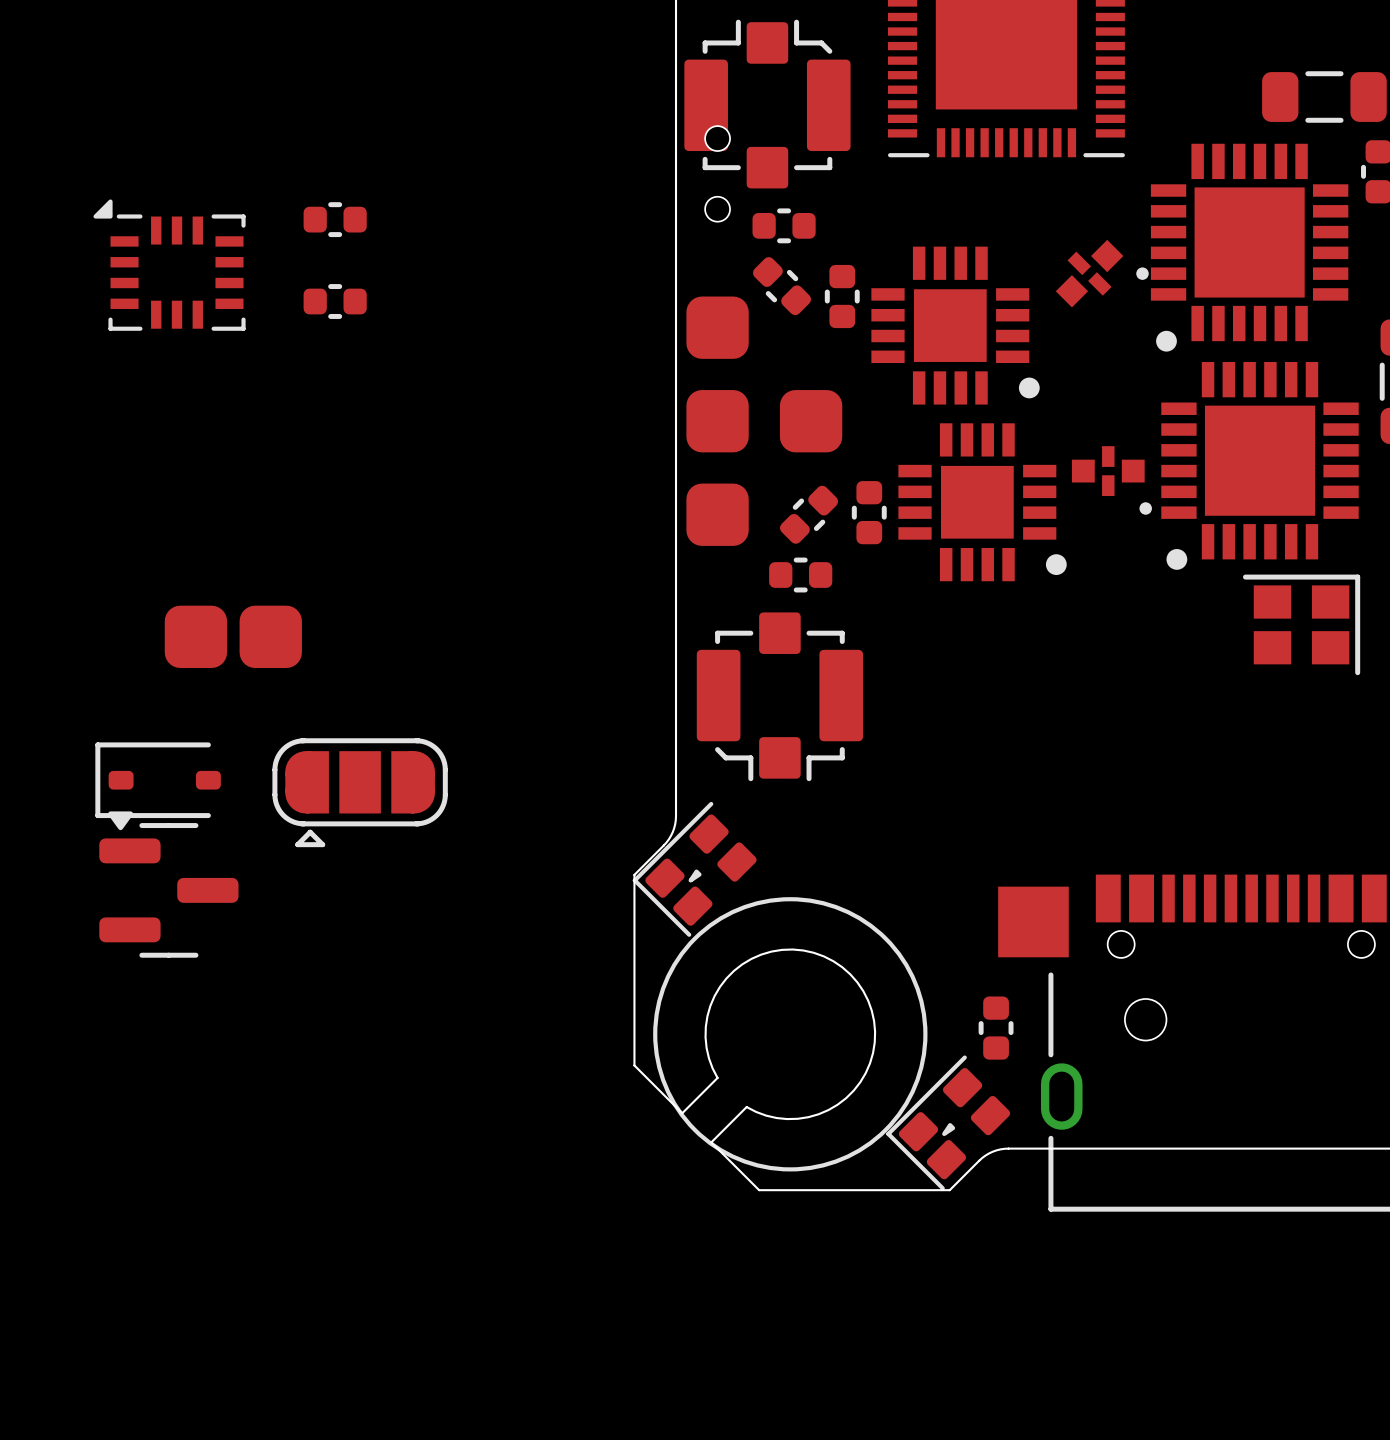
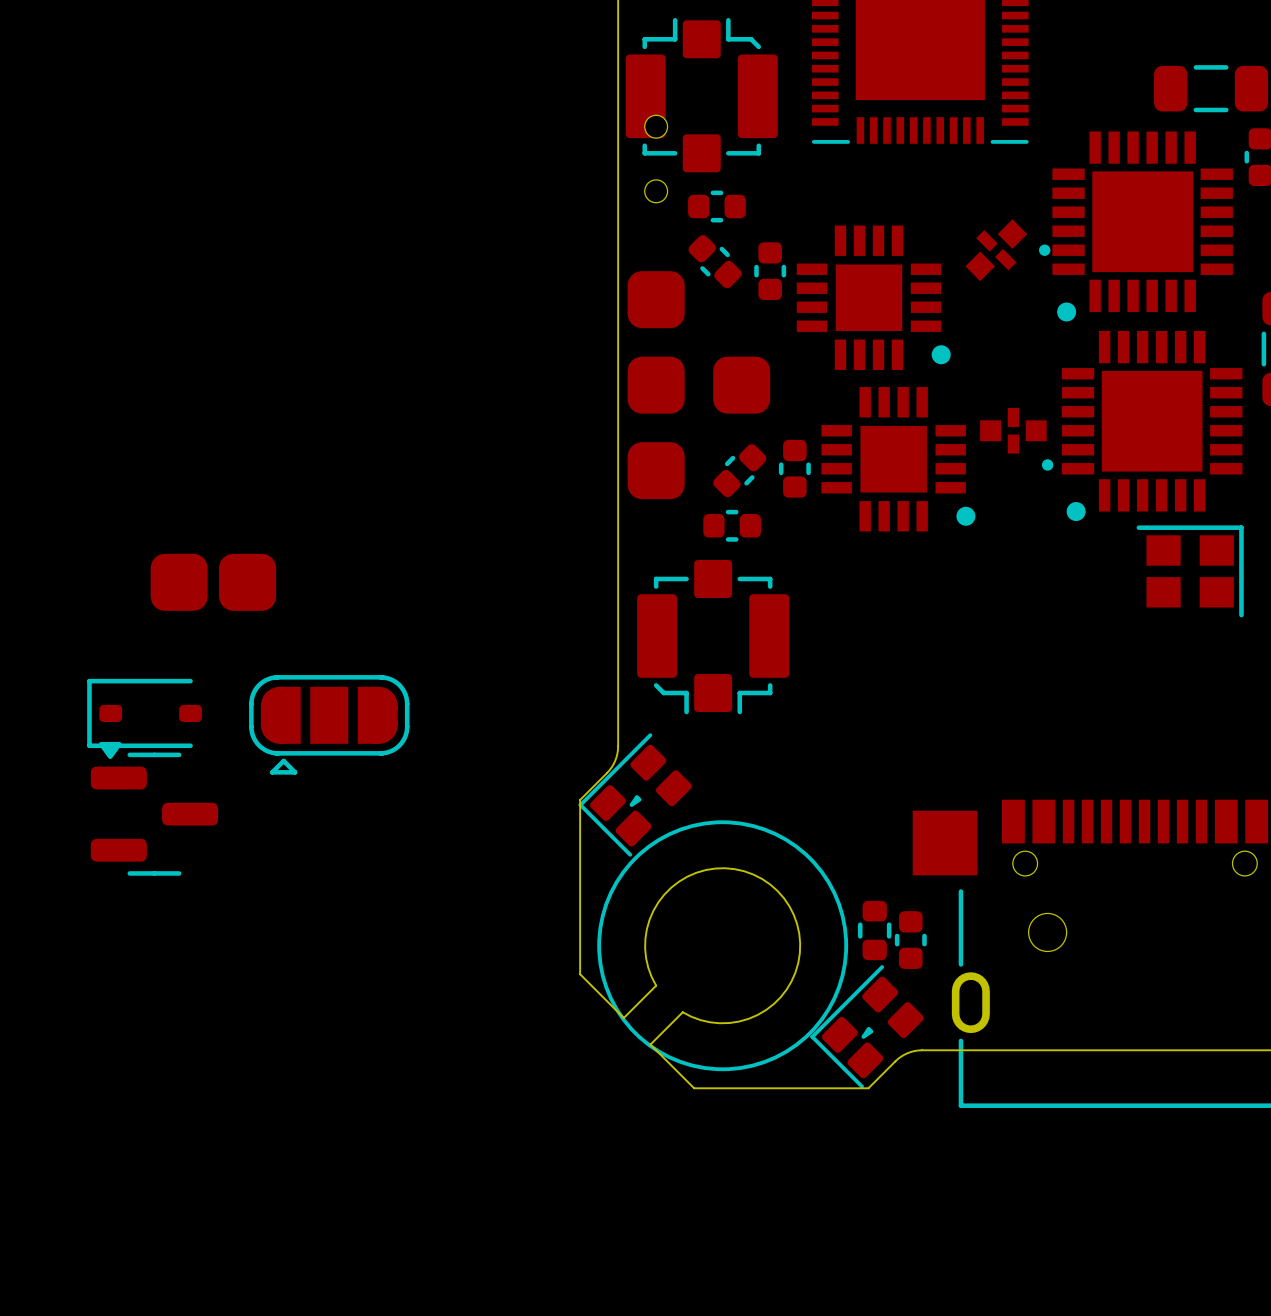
part: (335, 219) -> none
part: (169, 265) -> none
part: (335, 301) -> none
part: none -> (874, 930)

